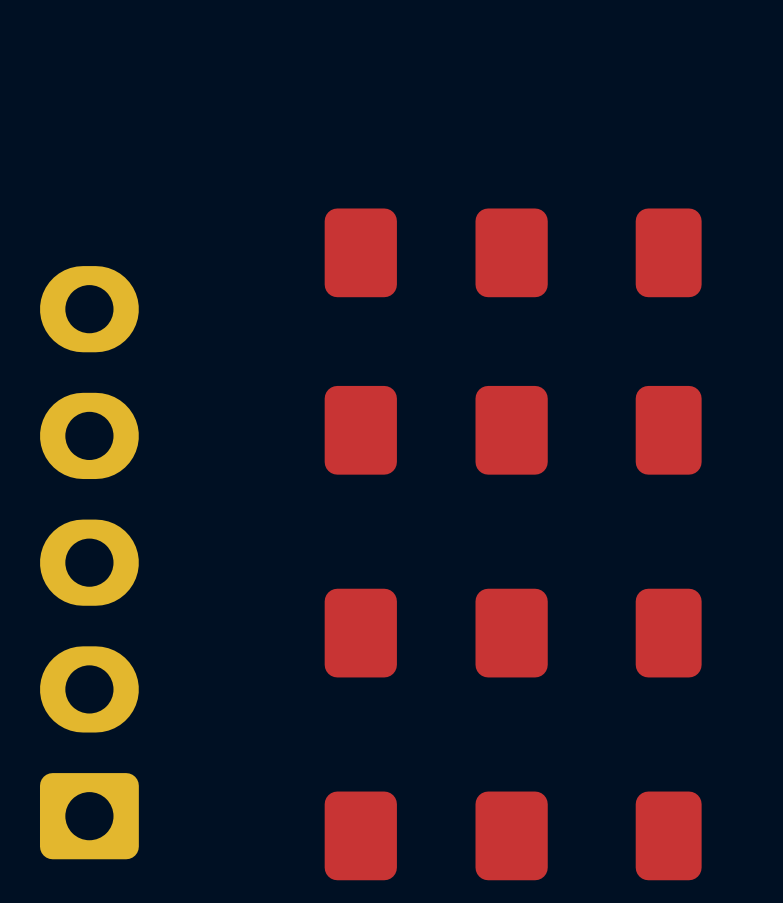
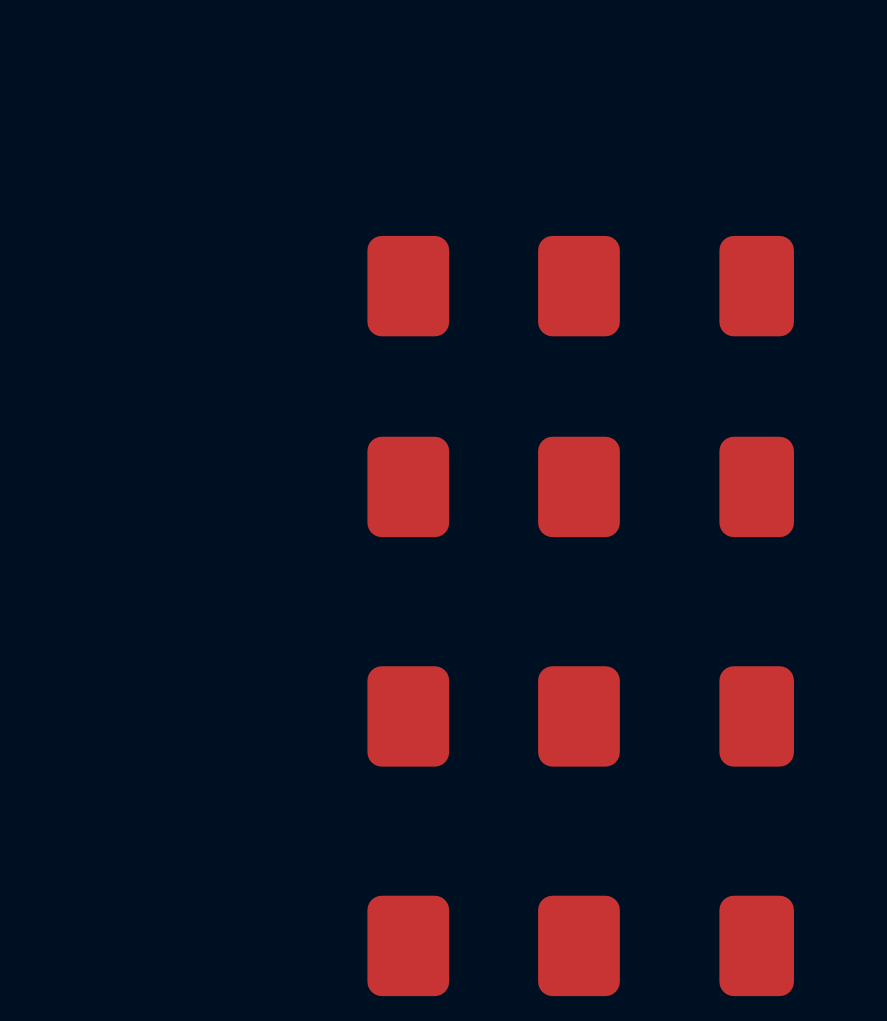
part: (89, 562) -> none

